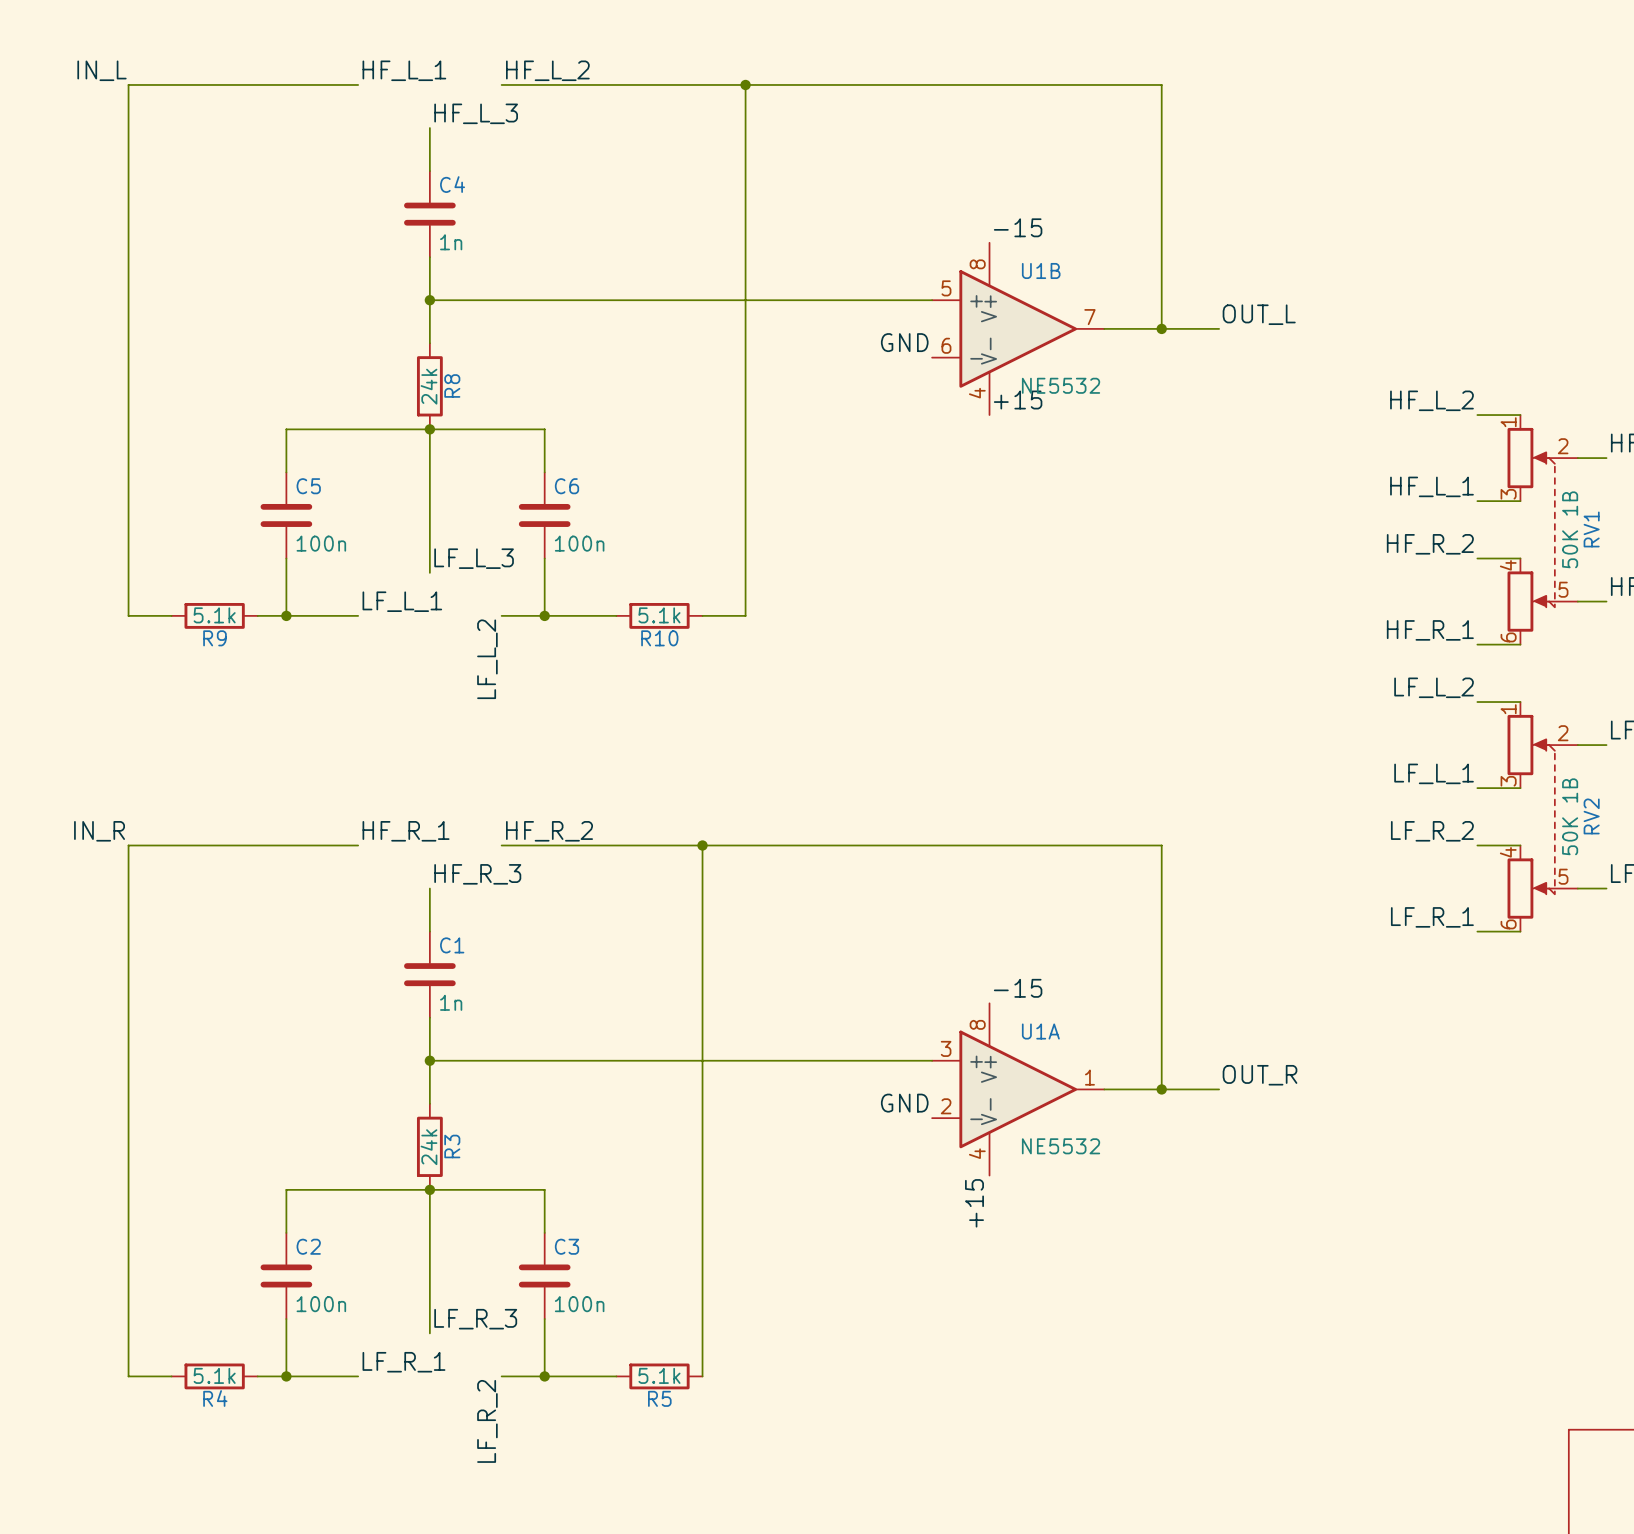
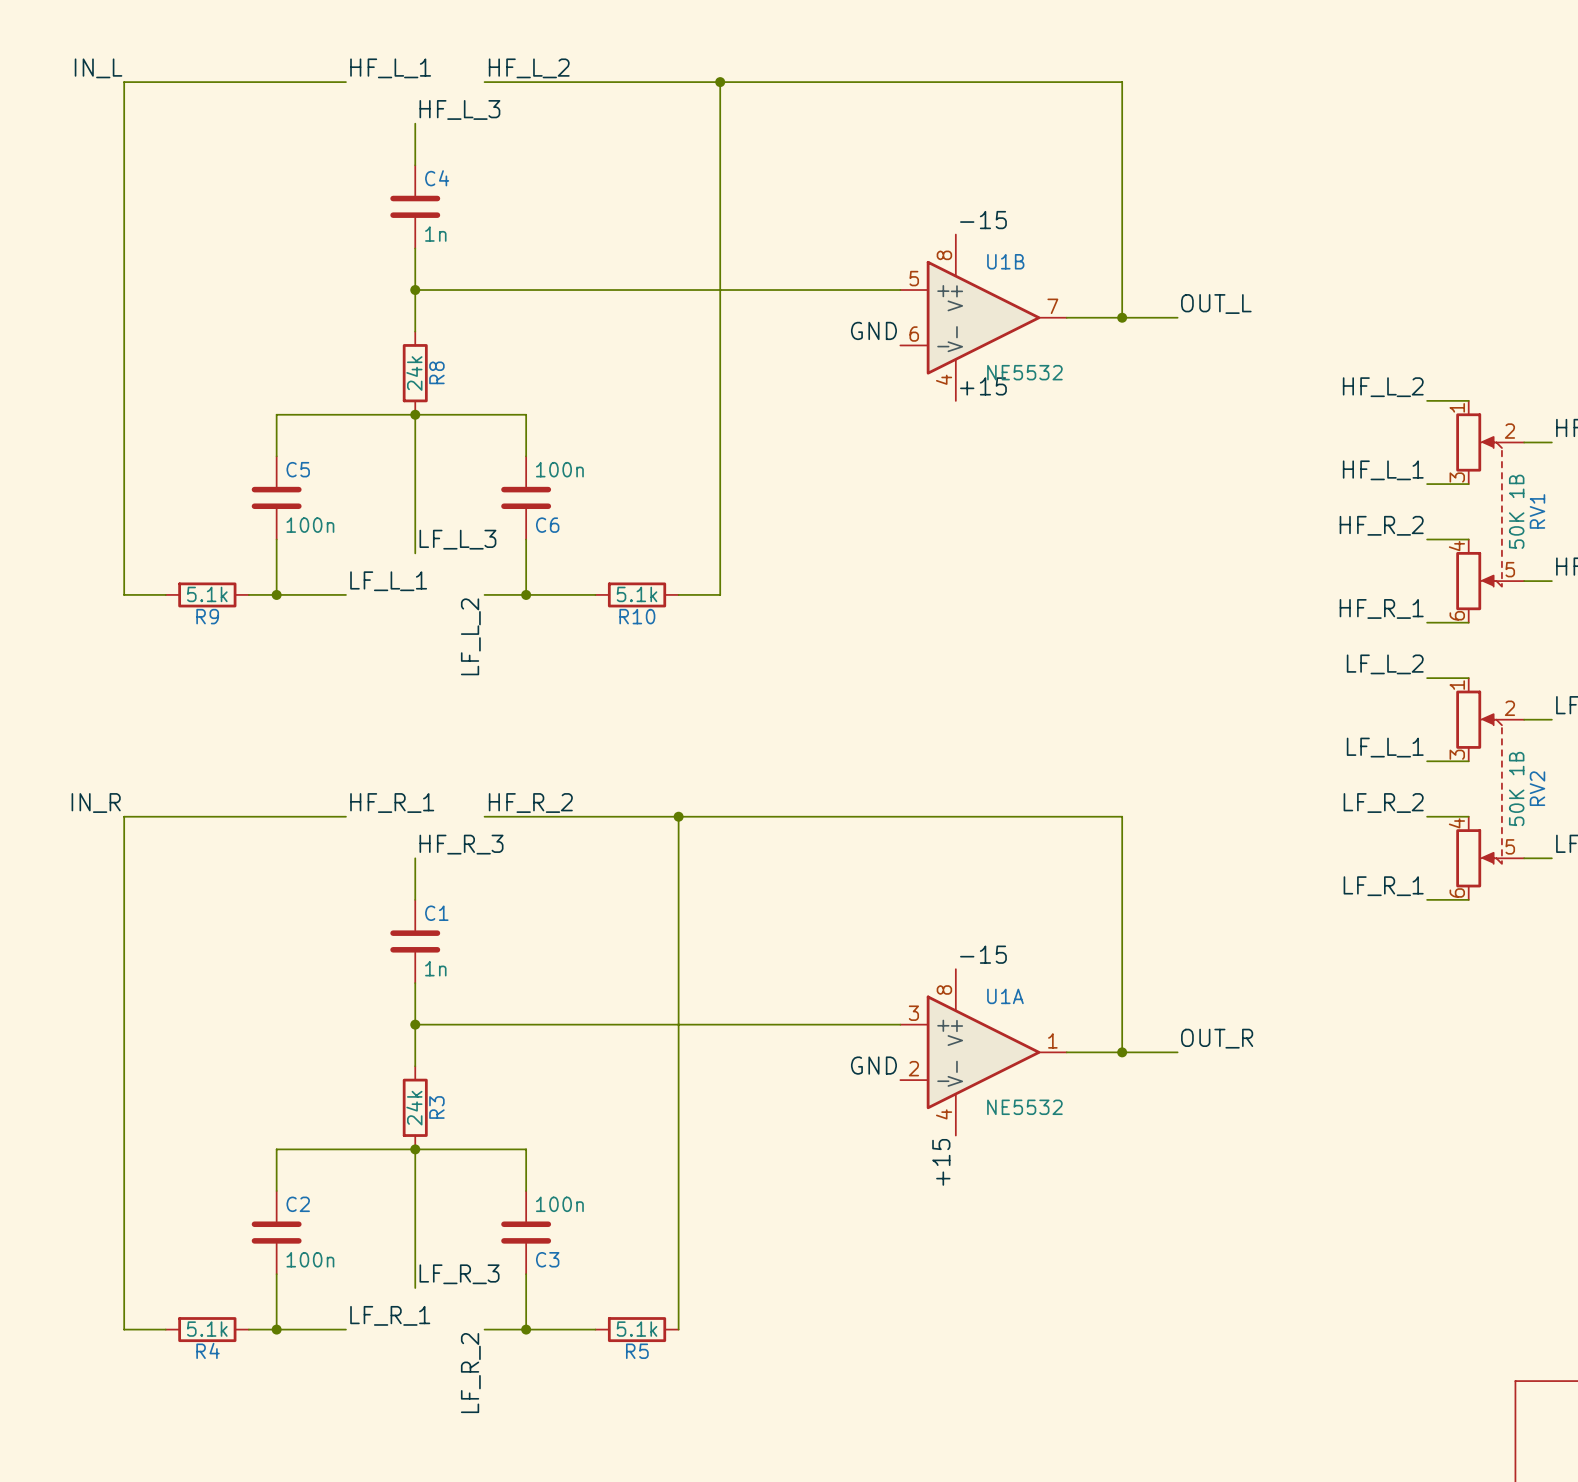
C6 name position: C6 (566, 486) -> C6 (547, 525)
C6 value position: 100n (579, 543) -> 100n (559, 469)
C3 name position: C3 (566, 1246) -> C3 (547, 1259)
C3 value position: 100n (579, 1304) -> 100n (559, 1204)

